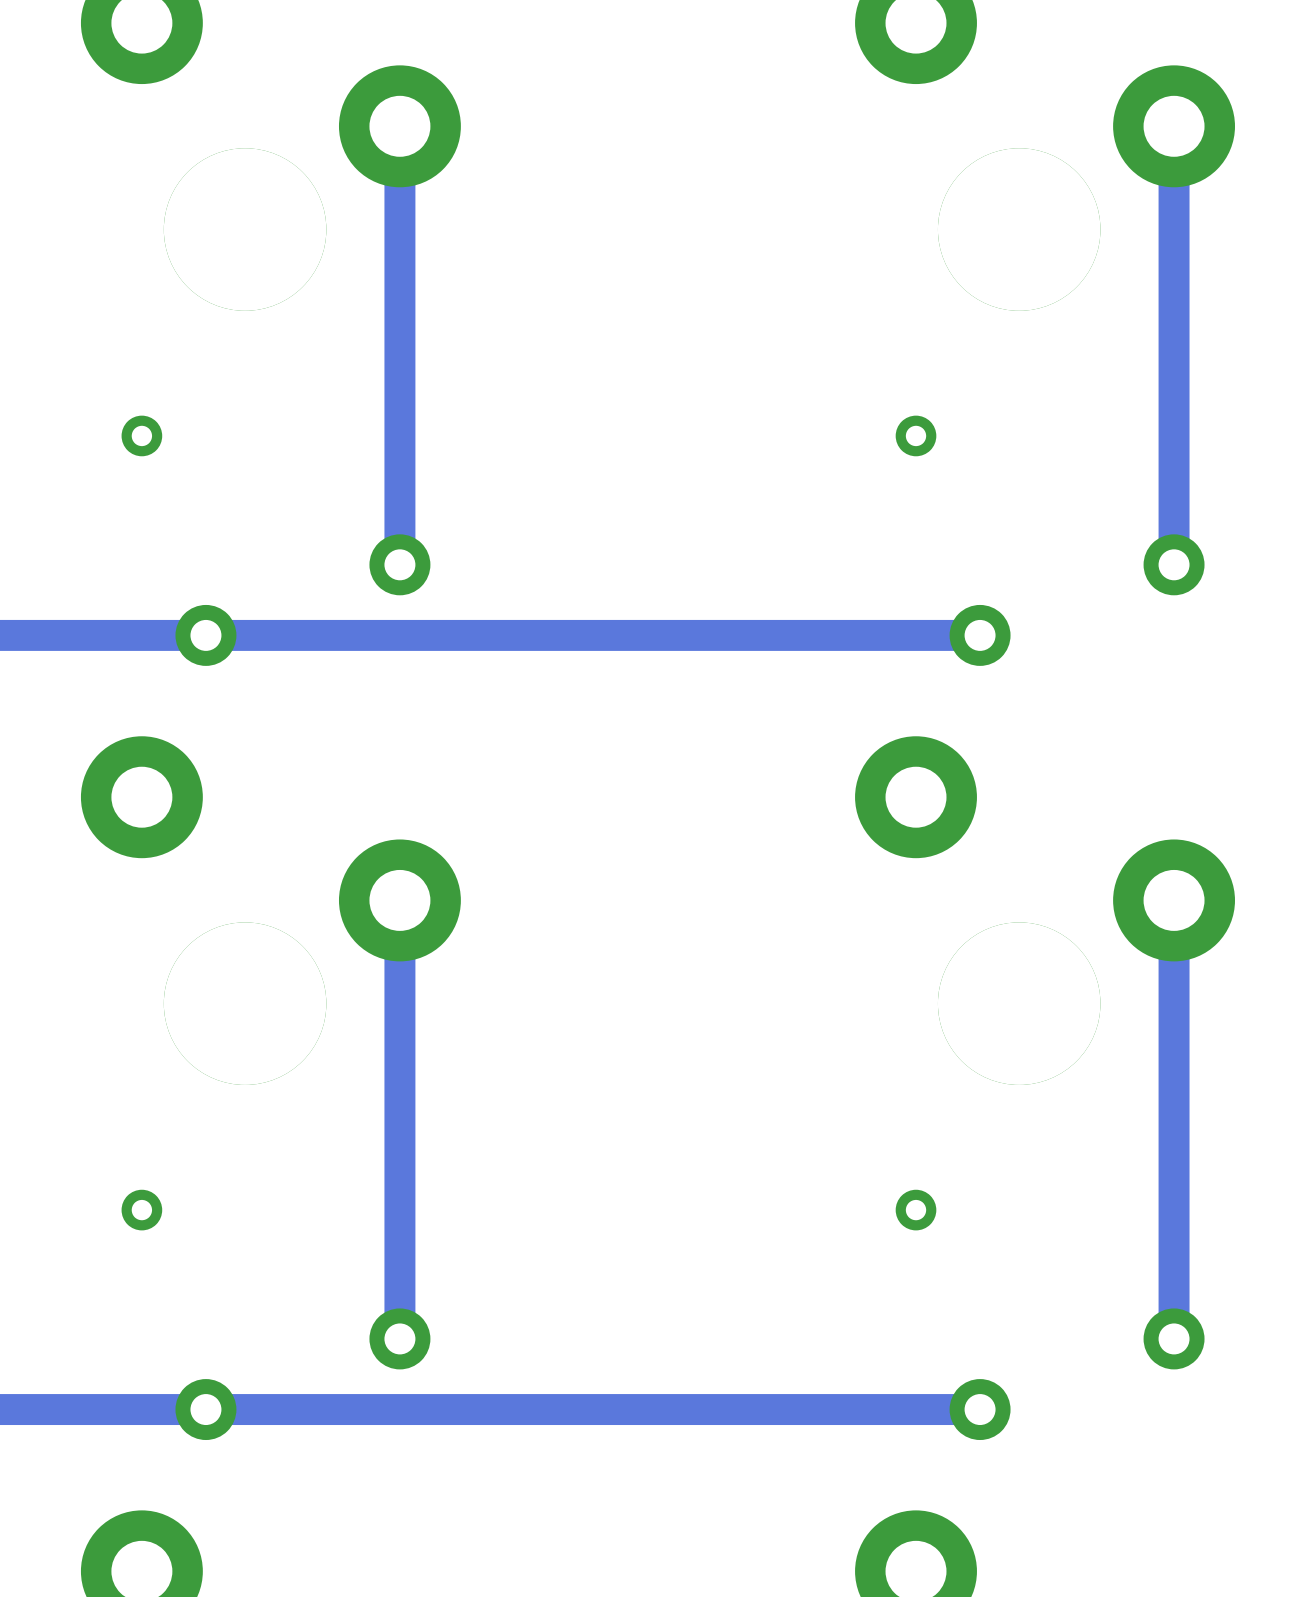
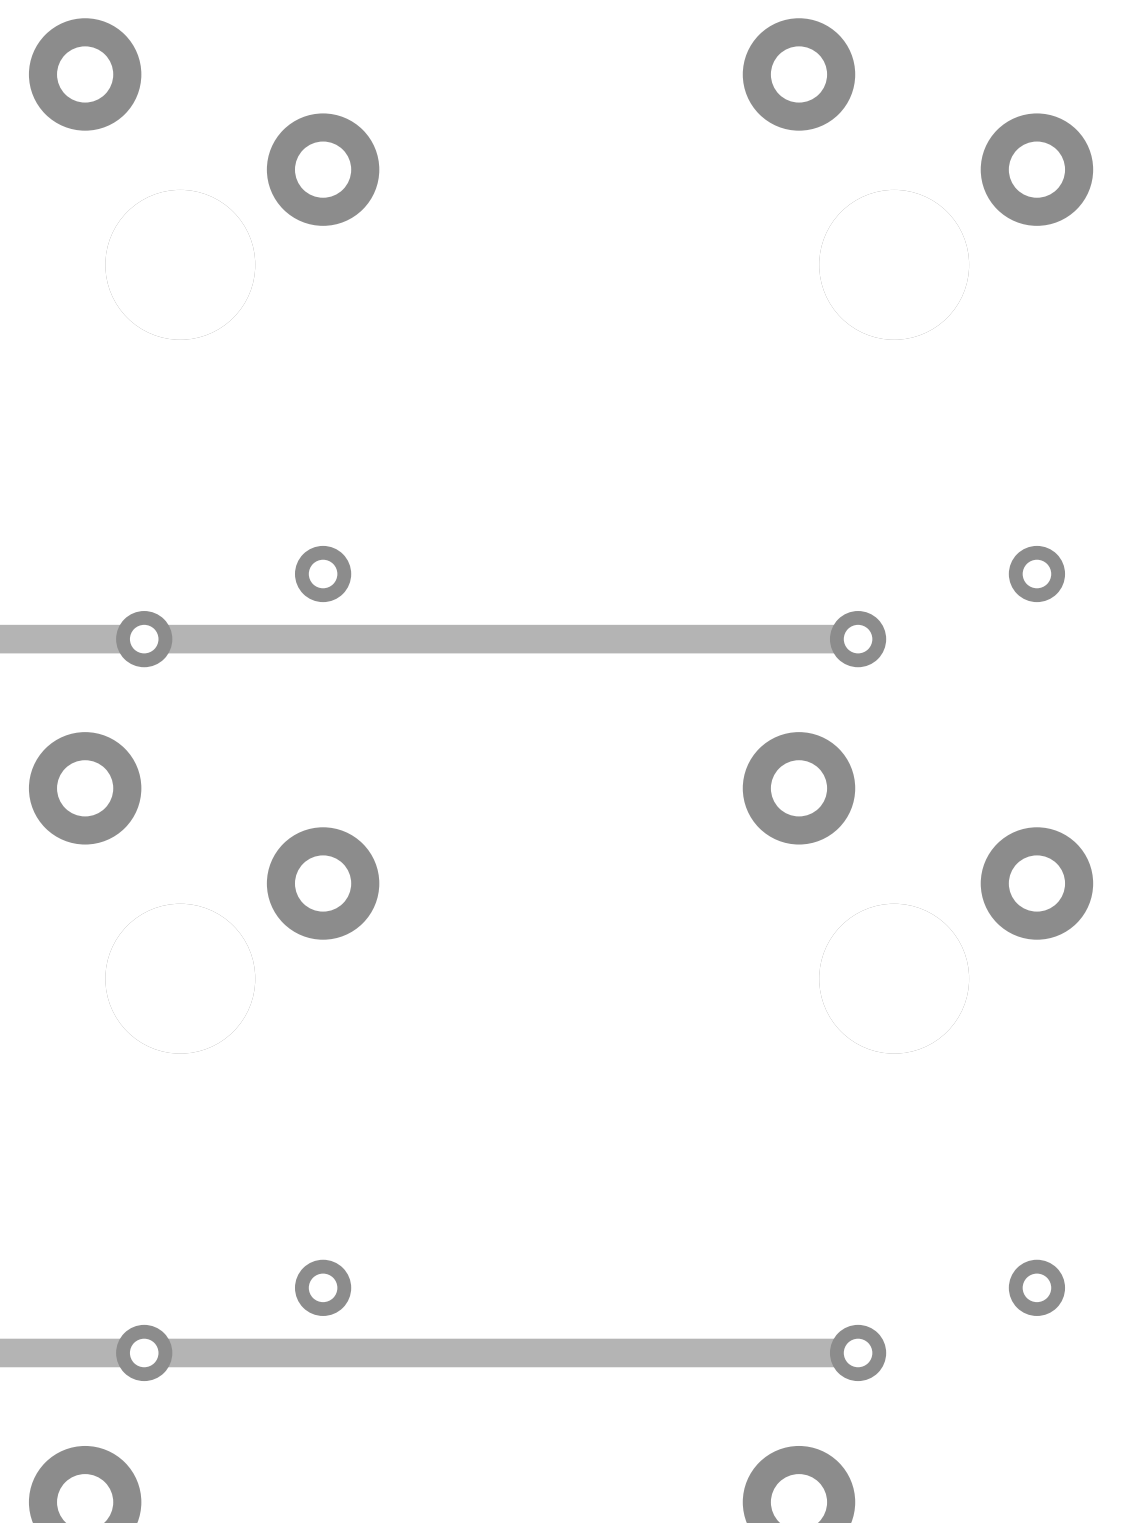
track: (399, 126) (399, 564) -> none
track: (1174, 126) (1174, 564) -> none
via: (141, 435) -> none
via: (916, 435) -> none
track: (399, 900) (399, 1338) -> none
track: (1174, 900) (1174, 1338) -> none
via: (141, 1210) -> none
via: (916, 1210) -> none

